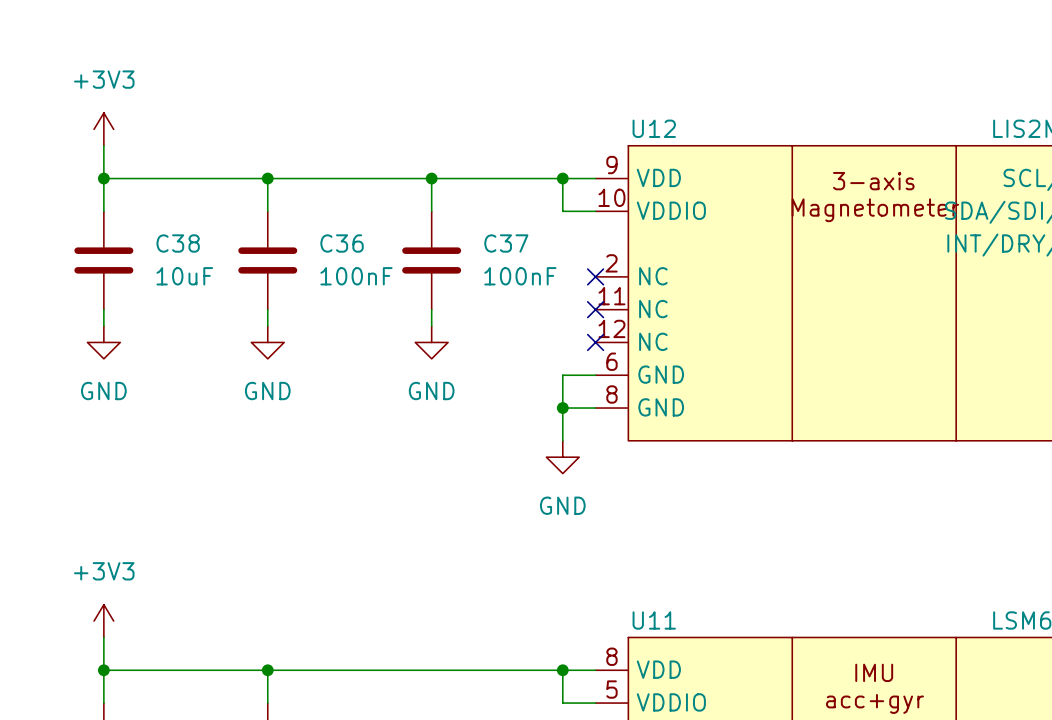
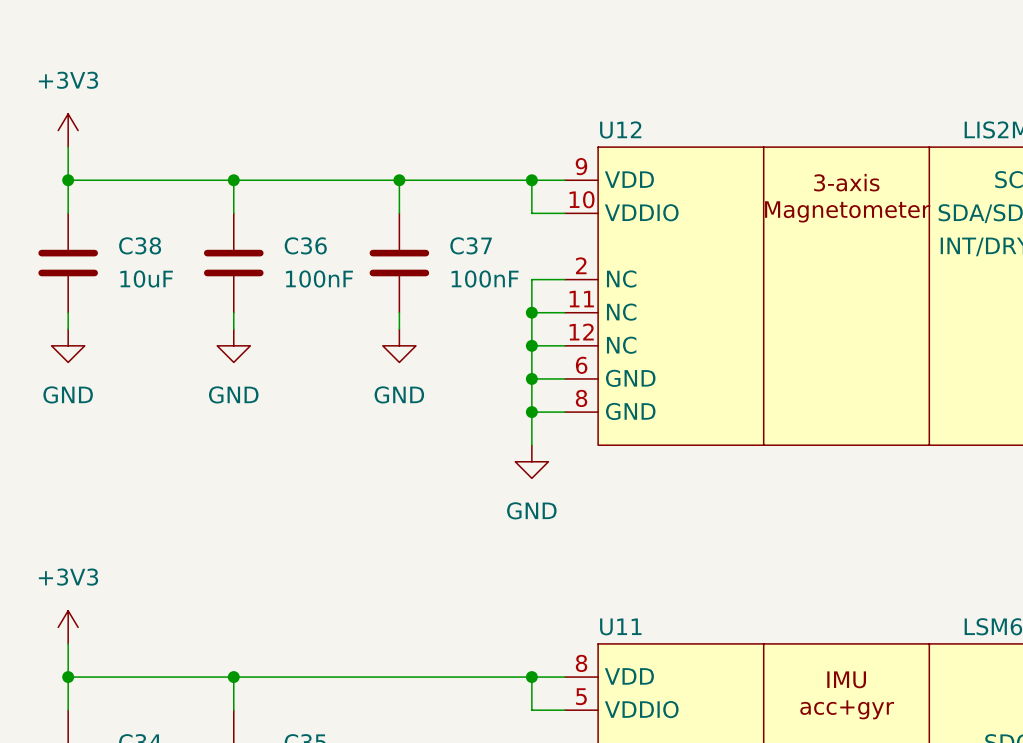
wire: none -> (564, 279) (531, 279) (531, 378)
no-connect mark: (595, 276) -> none
wire: none -> (531, 312) (564, 312)
junction: none -> (531, 312)
no-connect mark: (595, 309) -> none
wire: none -> (531, 345) (564, 345)
junction: none -> (531, 345)
no-connect mark: (595, 342) -> none
junction: none -> (531, 378)

